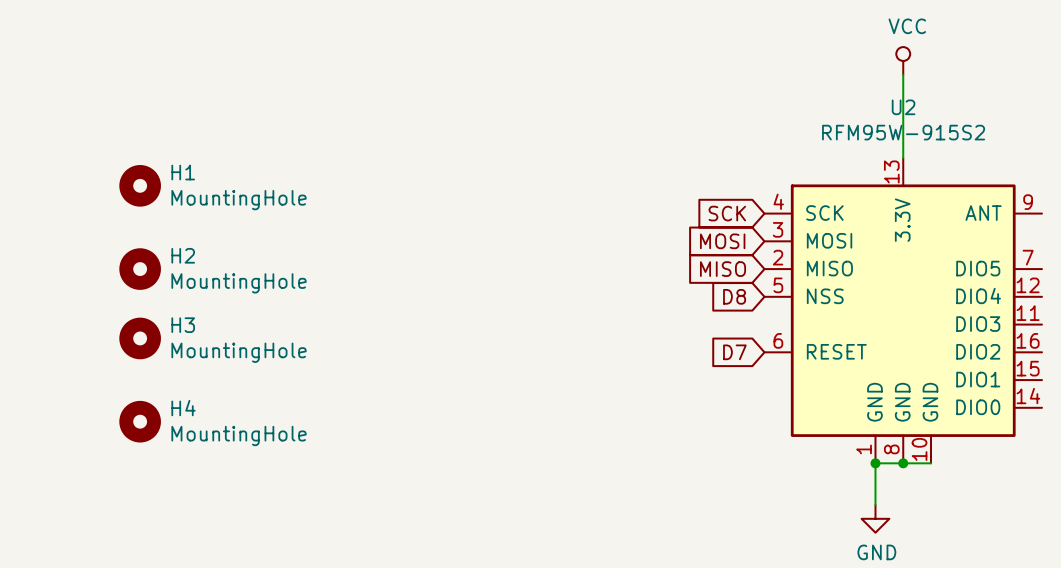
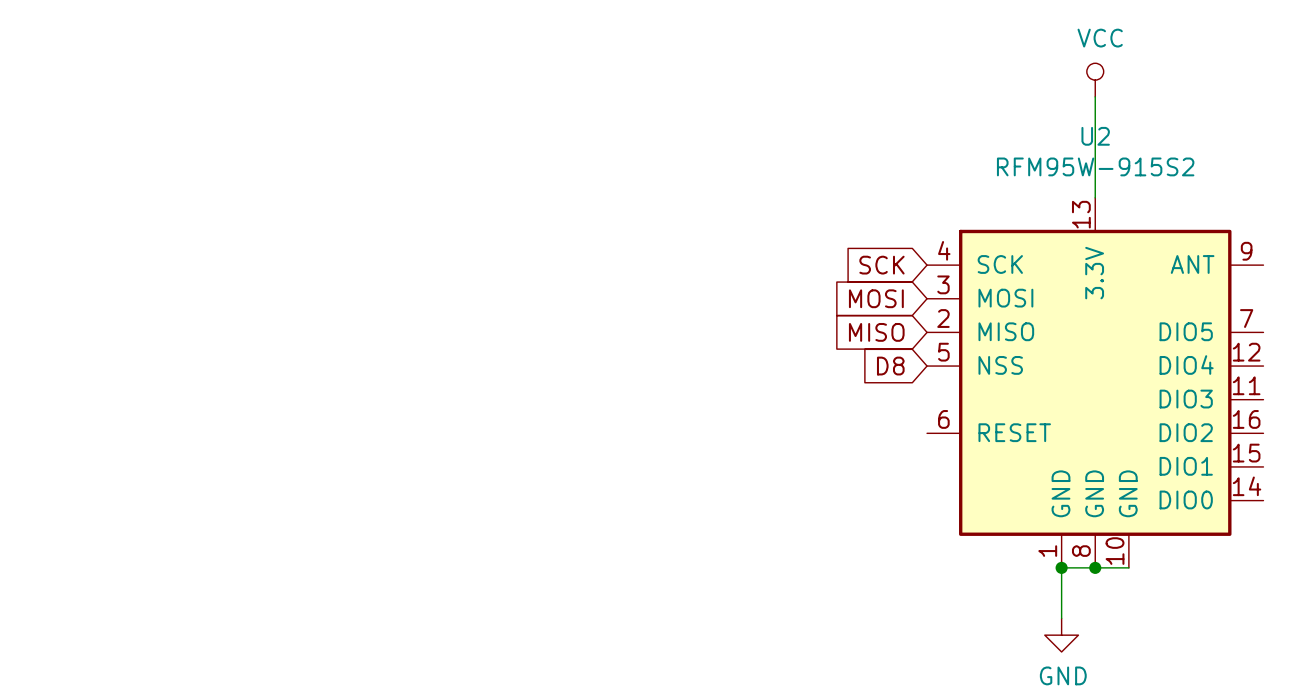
H1: MountingHole (140, 185) -> none
H2: MountingHole (140, 269) -> none
H3: MountingHole (140, 338) -> none
global label: D7 (734, 352) -> none
H4: MountingHole (140, 421) -> none

